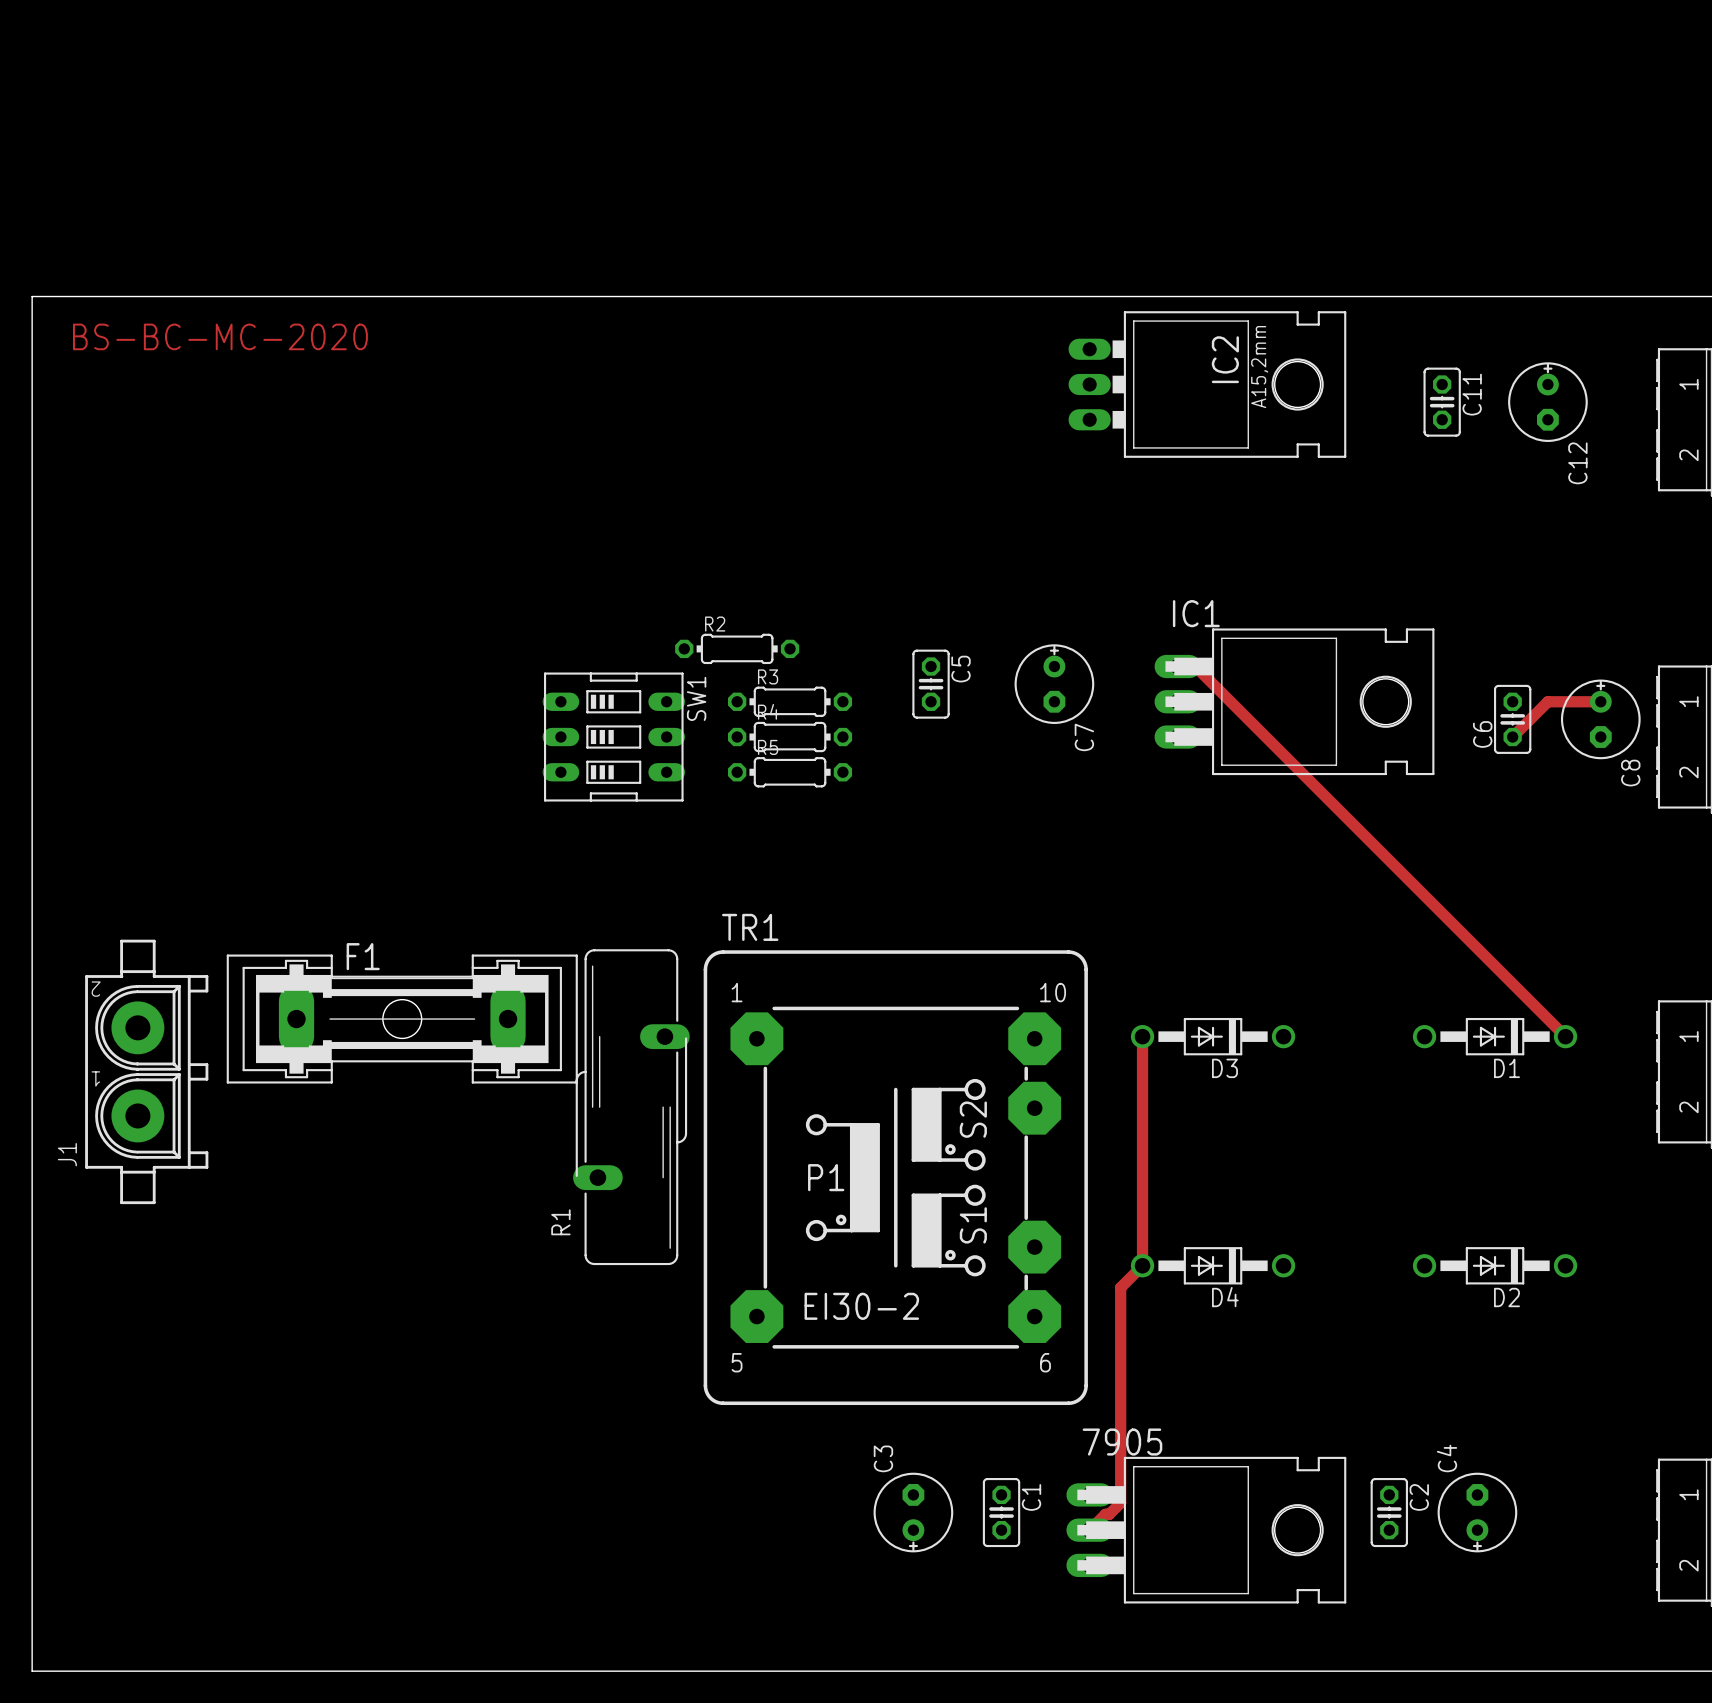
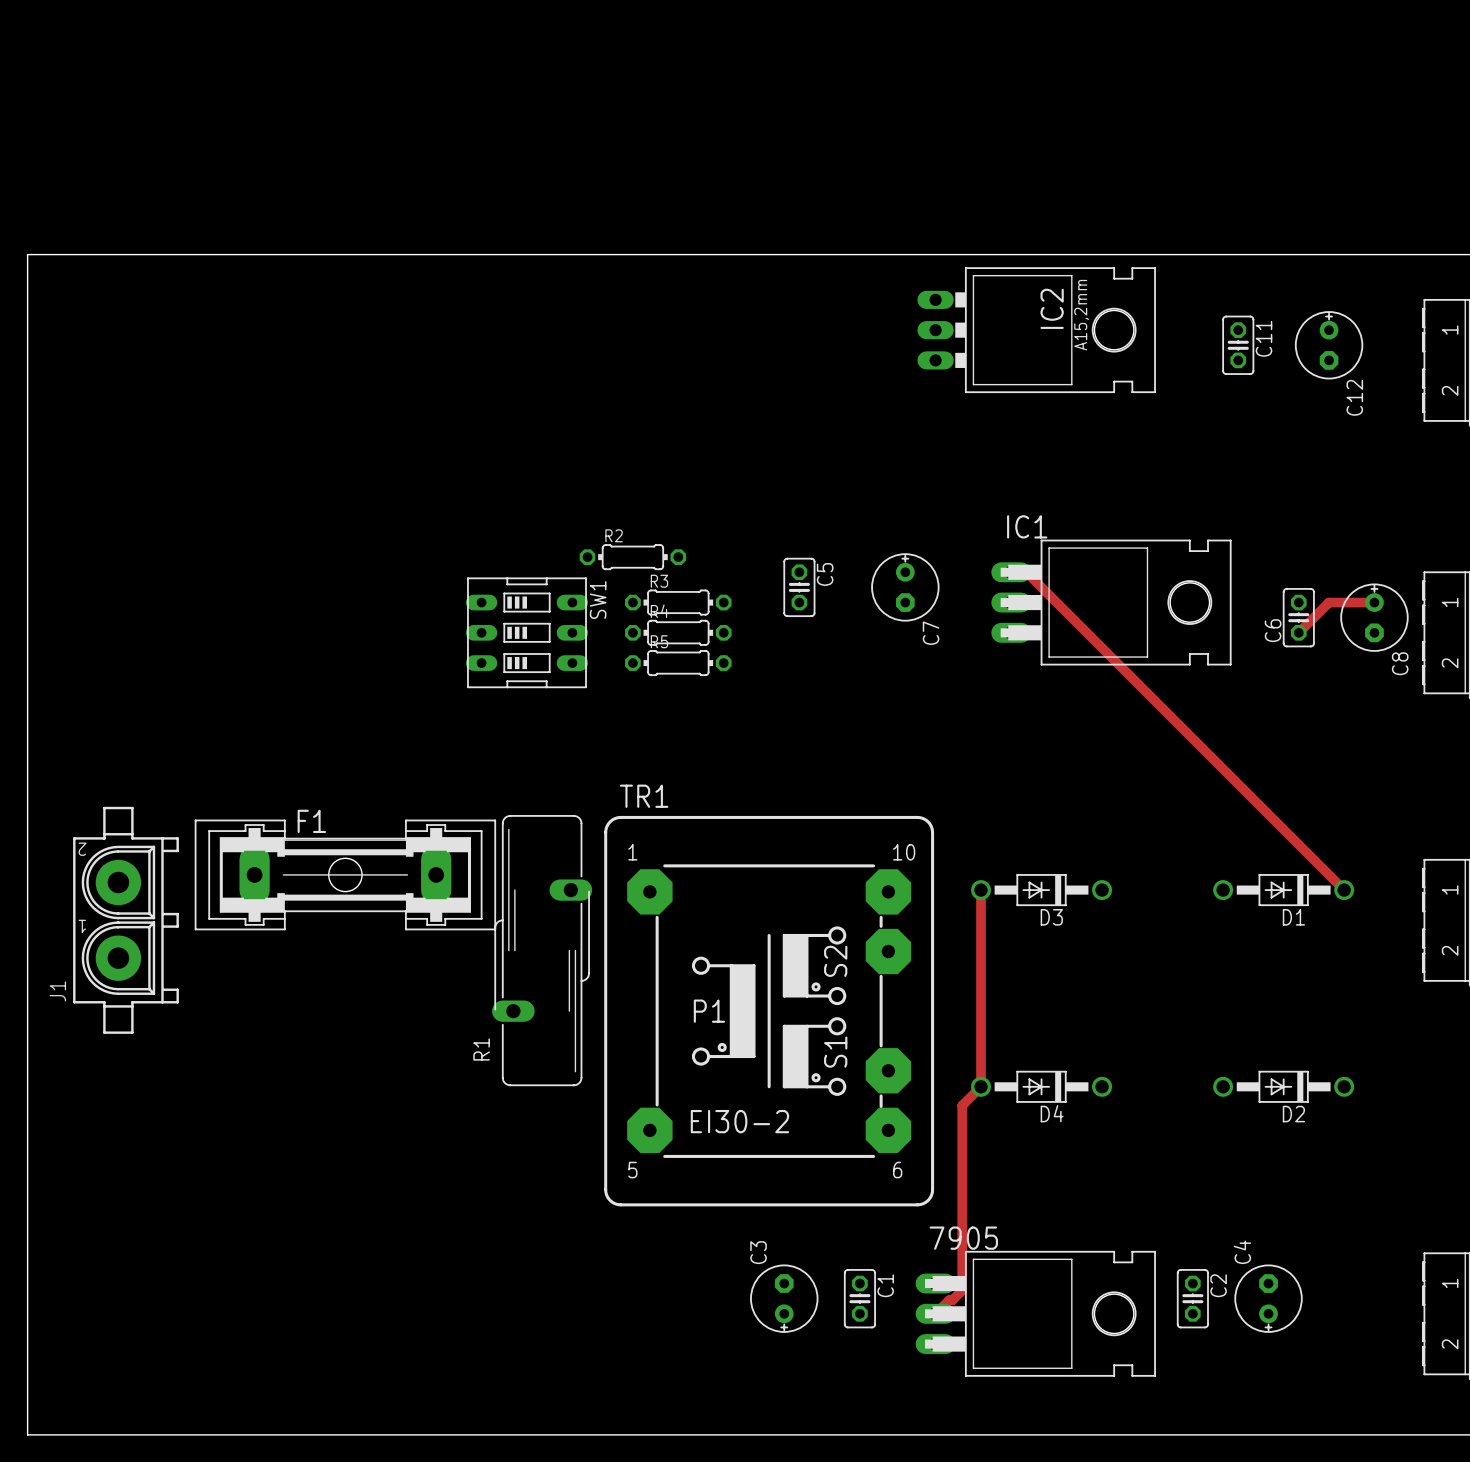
text: BS-BC-MC-2020 (220, 336) -> none

